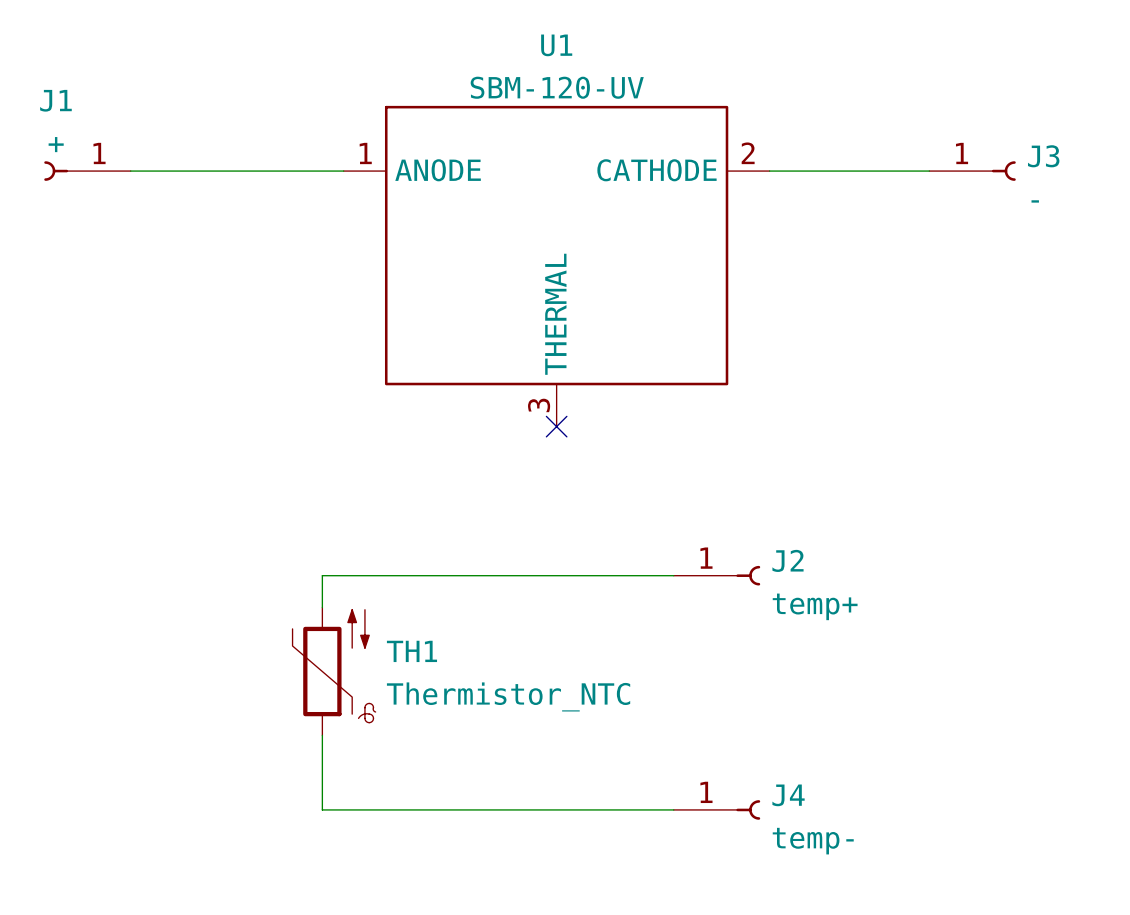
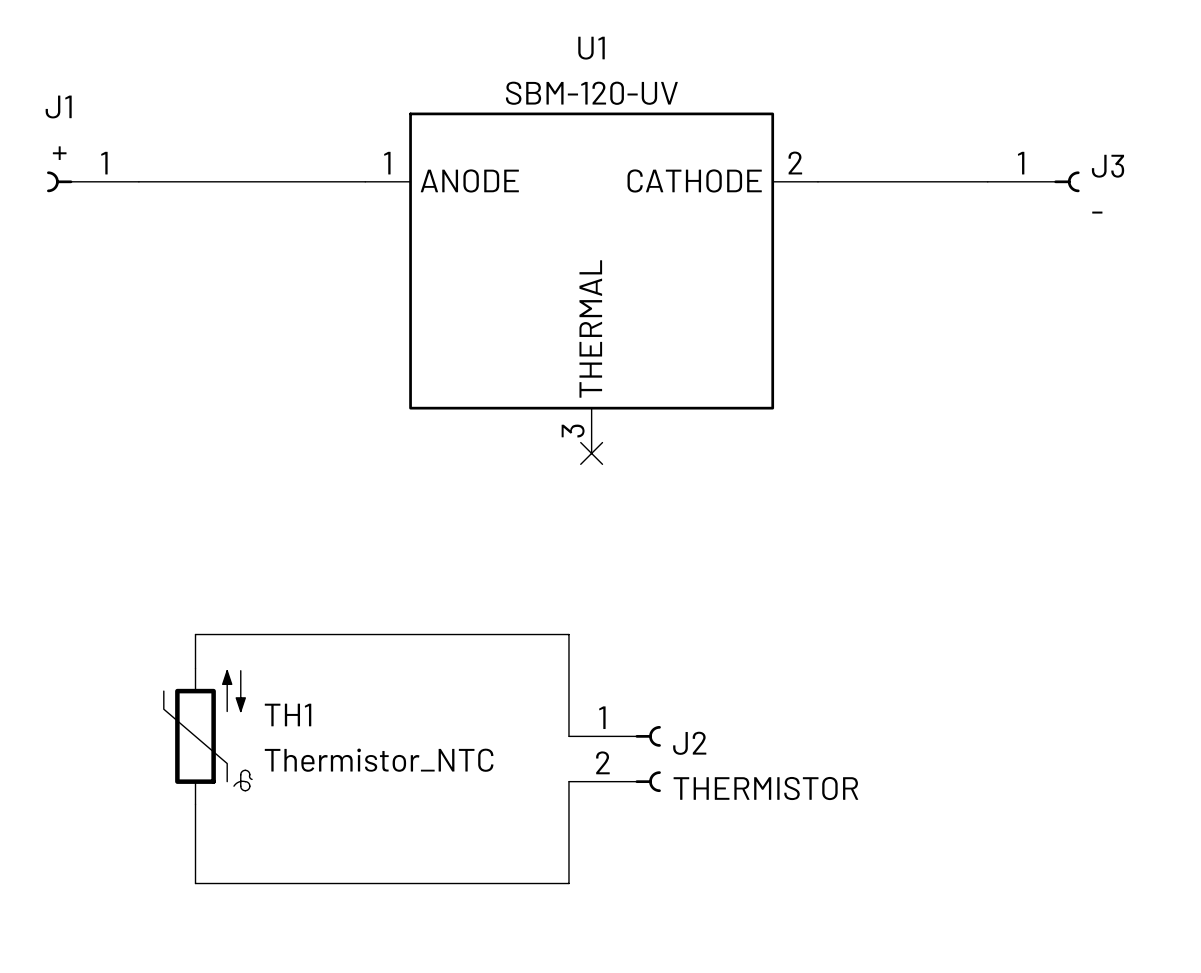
J2 symbol: [673, 565, 761, 586] -> [568, 725, 661, 793]
wire: (673, 575) (322, 575) (322, 607) -> none
J2 value: temp+ (815, 606) -> THERMISTOR (765, 788)
wire: none -> (195, 668) (195, 634) (568, 634) (568, 736)
TH1 position: (334, 671) -> (207, 736)
wire: (322, 735) (322, 809) (673, 809) -> none
wire: none -> (568, 781) (568, 883) (195, 883) (195, 804)
J4: temp- (716, 809) -> none

